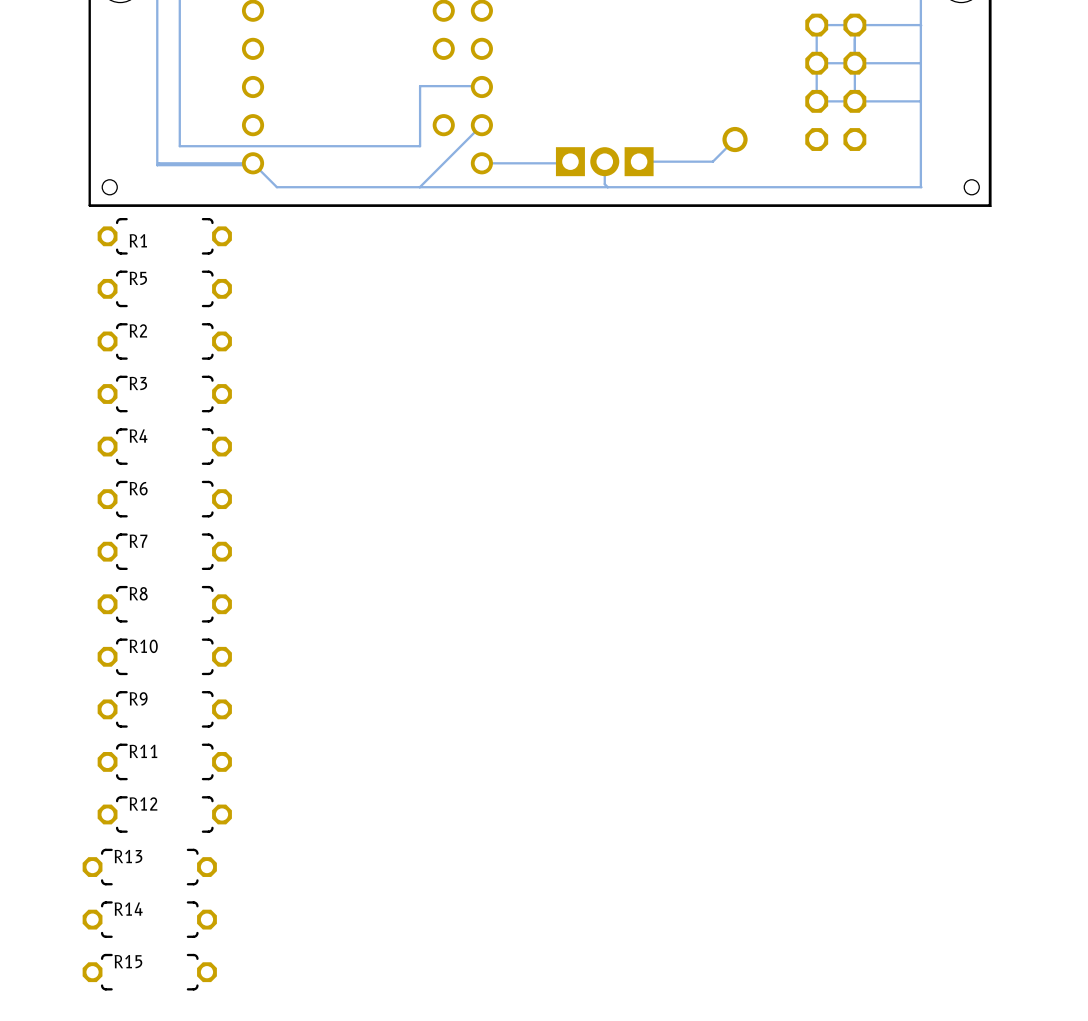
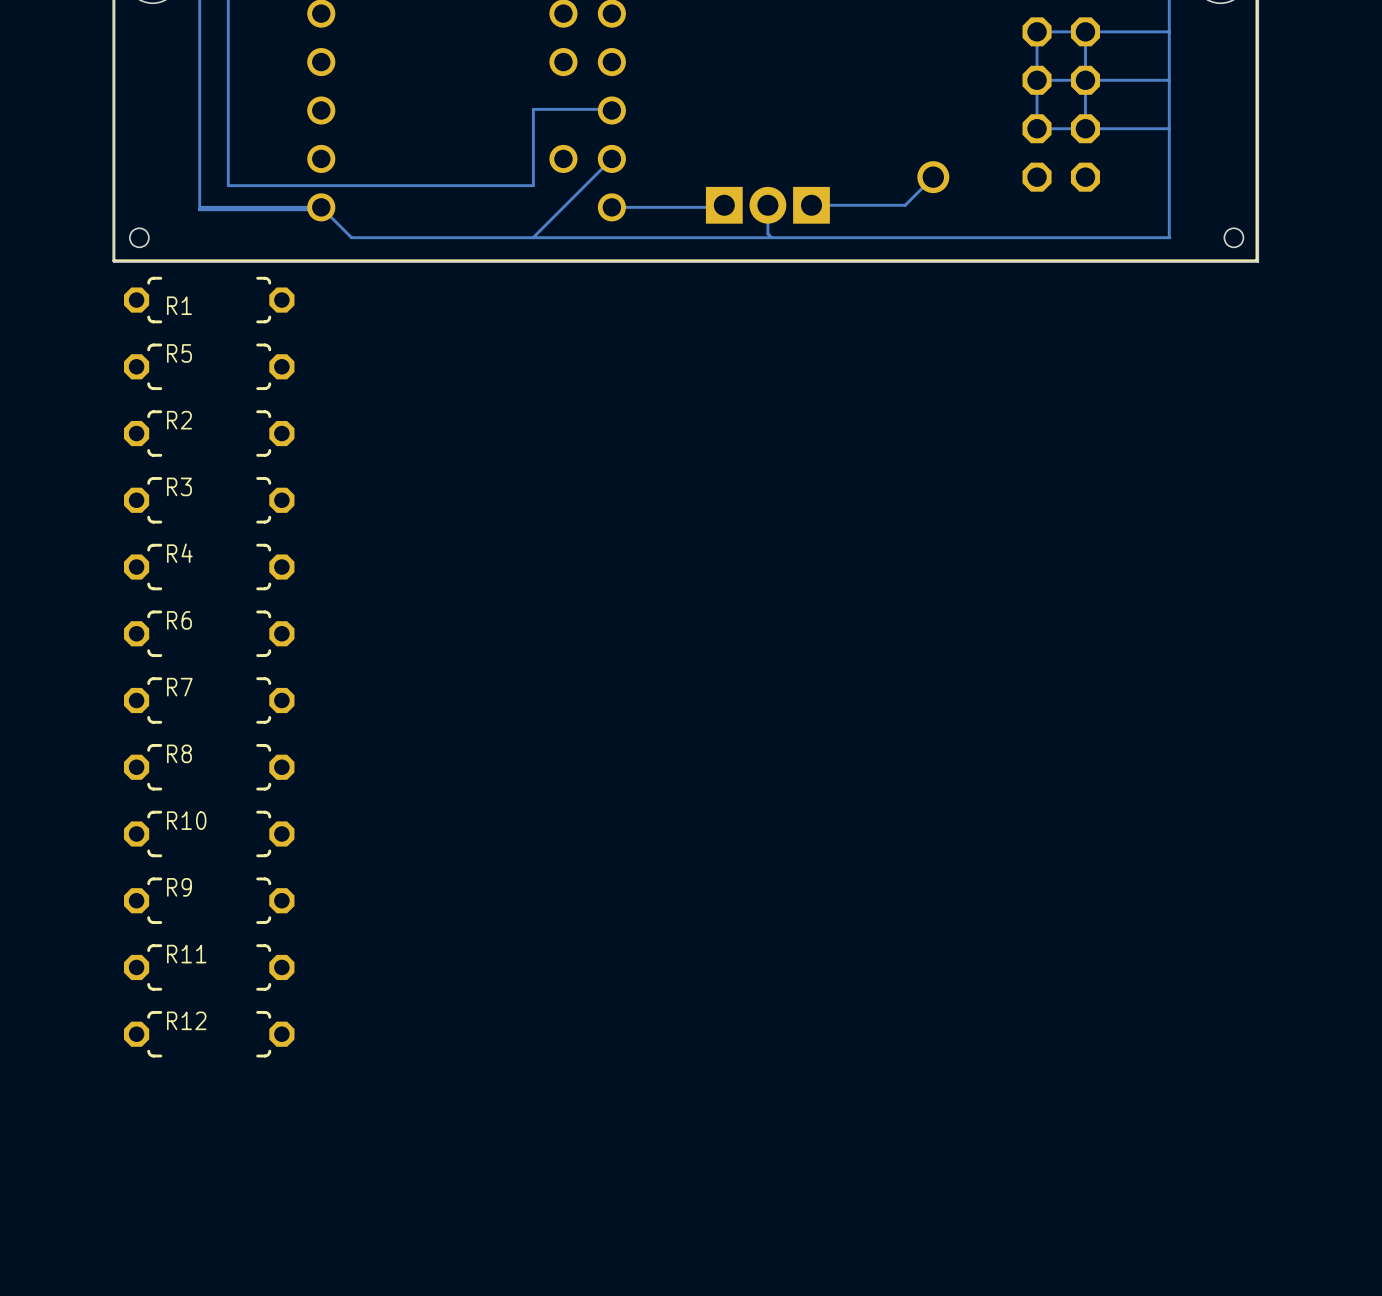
R13: (149, 867) -> none
R14: (149, 919) -> none
R15: (149, 972) -> none

